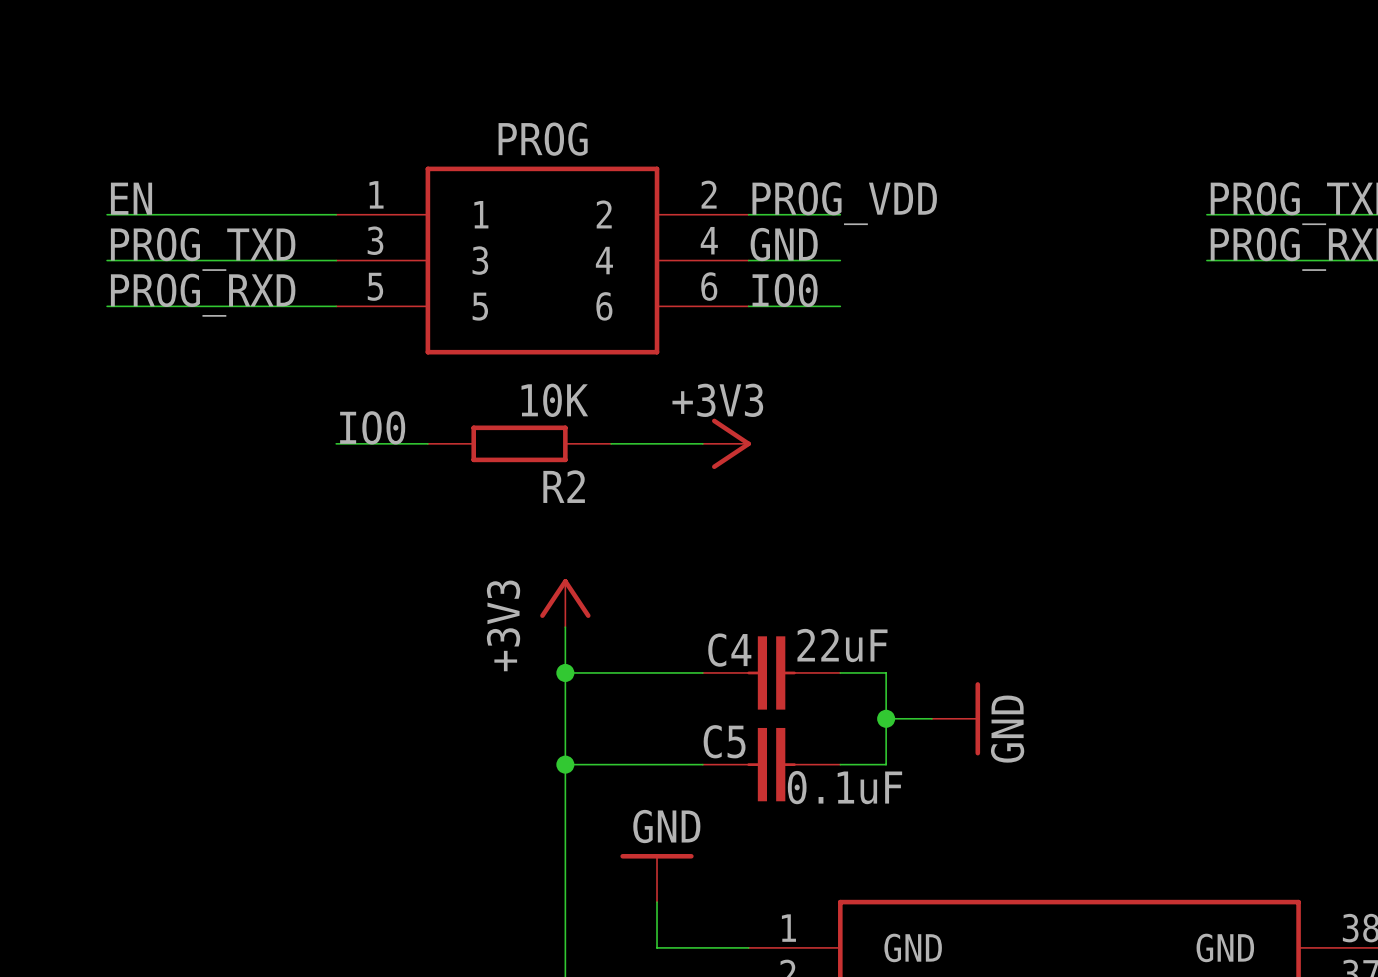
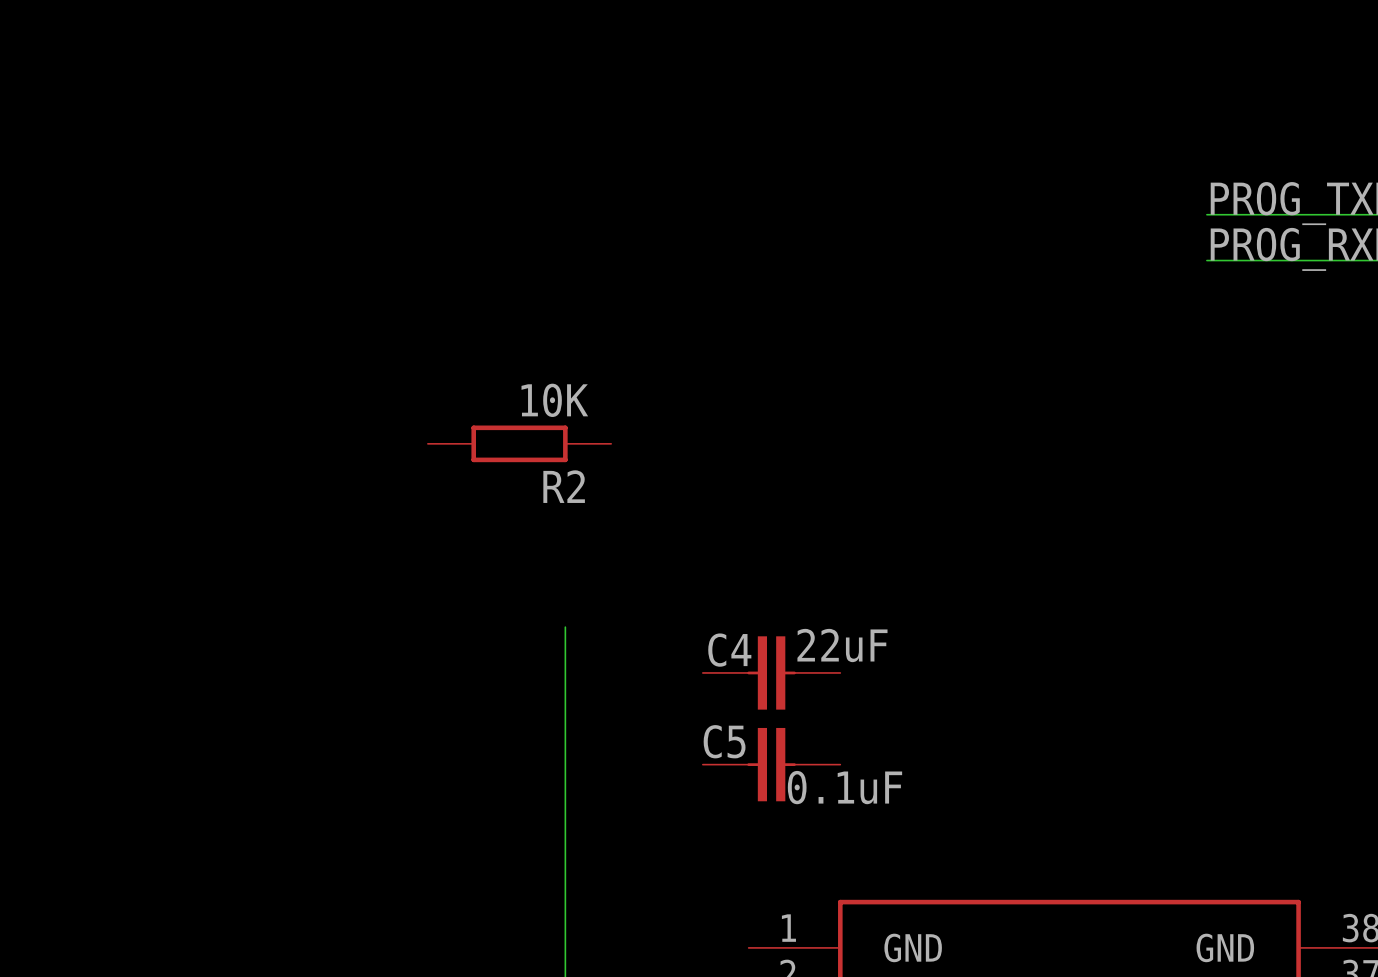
label: EN (131, 198) -> none
label: PROG_VDD (844, 203) -> none
wire: (107, 214) (336, 214) -> none
wire: (748, 214) (840, 214) -> none
label: GND (784, 244) -> none
label: PROG_TXD (203, 249) -> none
wire: (107, 260) (336, 260) -> none
PROG: (542, 260) -> none
wire: (748, 260) (840, 260) -> none
label: IO0 (785, 290) -> none
label: PROG_RXD (203, 295) -> none
wire: (107, 306) (336, 306) -> none
wire: (748, 306) (840, 306) -> none
label: IO0 (372, 427) -> none
wire: (336, 443) (427, 443) -> none
wire: (611, 443) (702, 443) -> none
power symbol: +3V3 (726, 443) -> none
power symbol: +3V3 (565, 603) -> none
wire: (565, 672) (702, 672) -> none
junction: (565, 672) -> none
wire: (840, 672) (886, 672) (886, 764) (840, 764) -> none
wire: (886, 718) (931, 718) -> none
junction: (886, 718) -> none
power symbol: GND (956, 718) -> none
wire: (565, 764) (702, 764) -> none
junction: (565, 764) -> none
power symbol: GND (657, 878) -> none
wire: (657, 902) (657, 947) (748, 947) -> none

